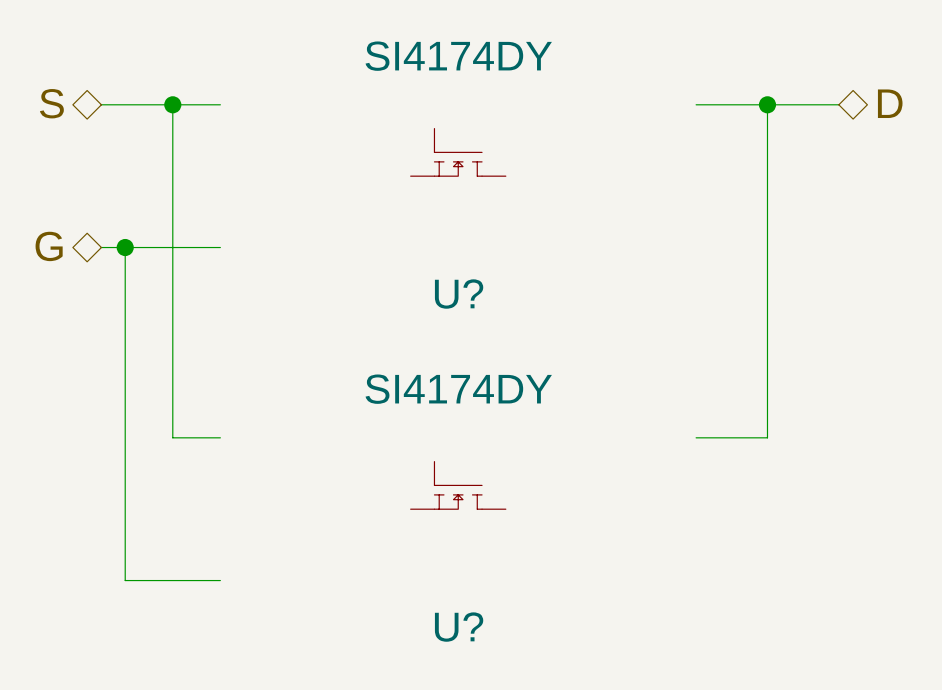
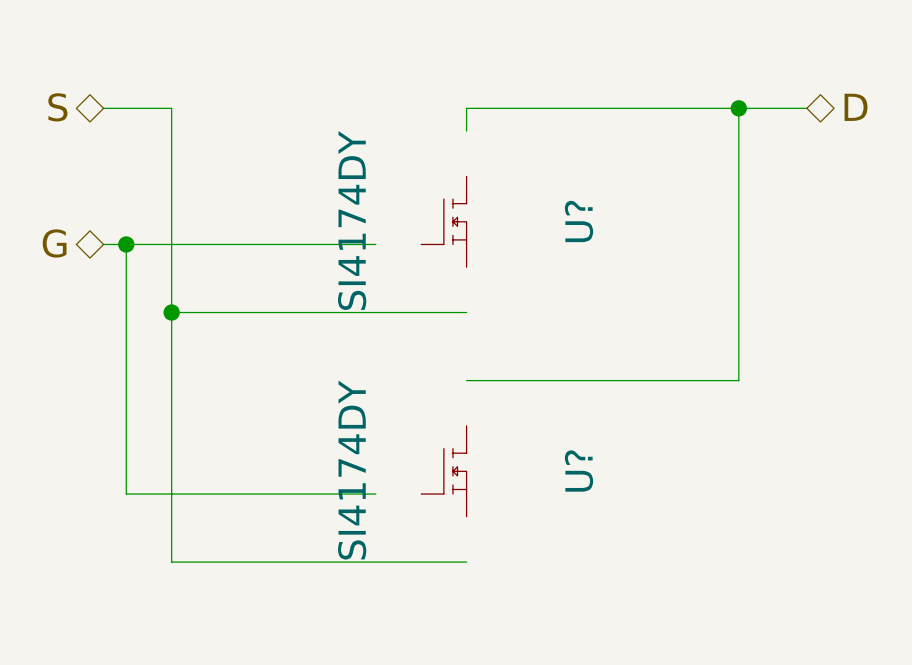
wire: (172, 104) (220, 104) -> none
junction: (172, 104) -> none
wire: none -> (670, 108) (466, 108) (466, 131)
U? position: (458, 152) -> (443, 221)
U? rotation: 0° (458, 164) -> 90° counterclockwise (455, 221)
wire: none -> (217, 244) (375, 244)
wire: none -> (171, 312) (466, 312)
junction: none -> (171, 312)
wire: (767, 390) (767, 437) (696, 437) -> (738, 380) (466, 380)
wire: (172, 437) (220, 437) -> none
U? rotation: 0° (458, 497) -> 90° counterclockwise (455, 471)
wire: (125, 509) (125, 580) (172, 580) -> (171, 425) (171, 562)
wire: none -> (126, 494) (375, 494)
wire: none -> (217, 562) (466, 562)

